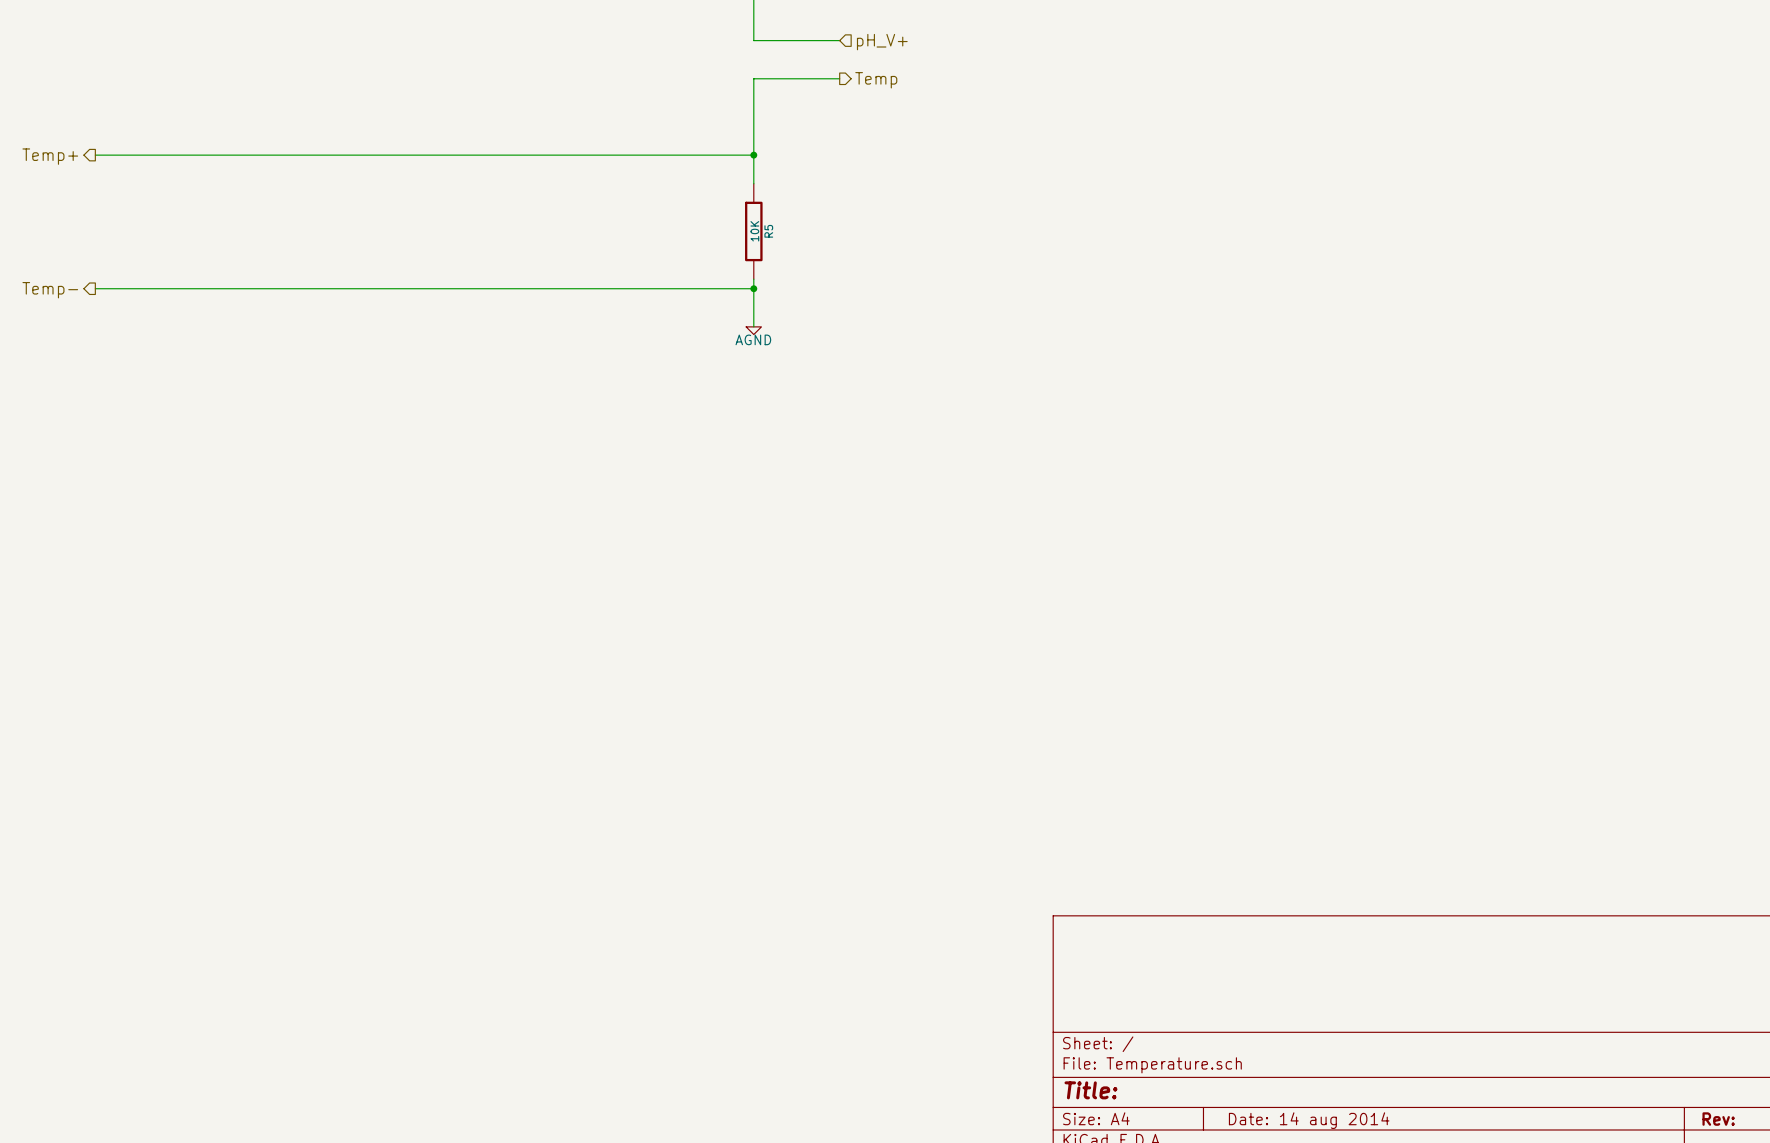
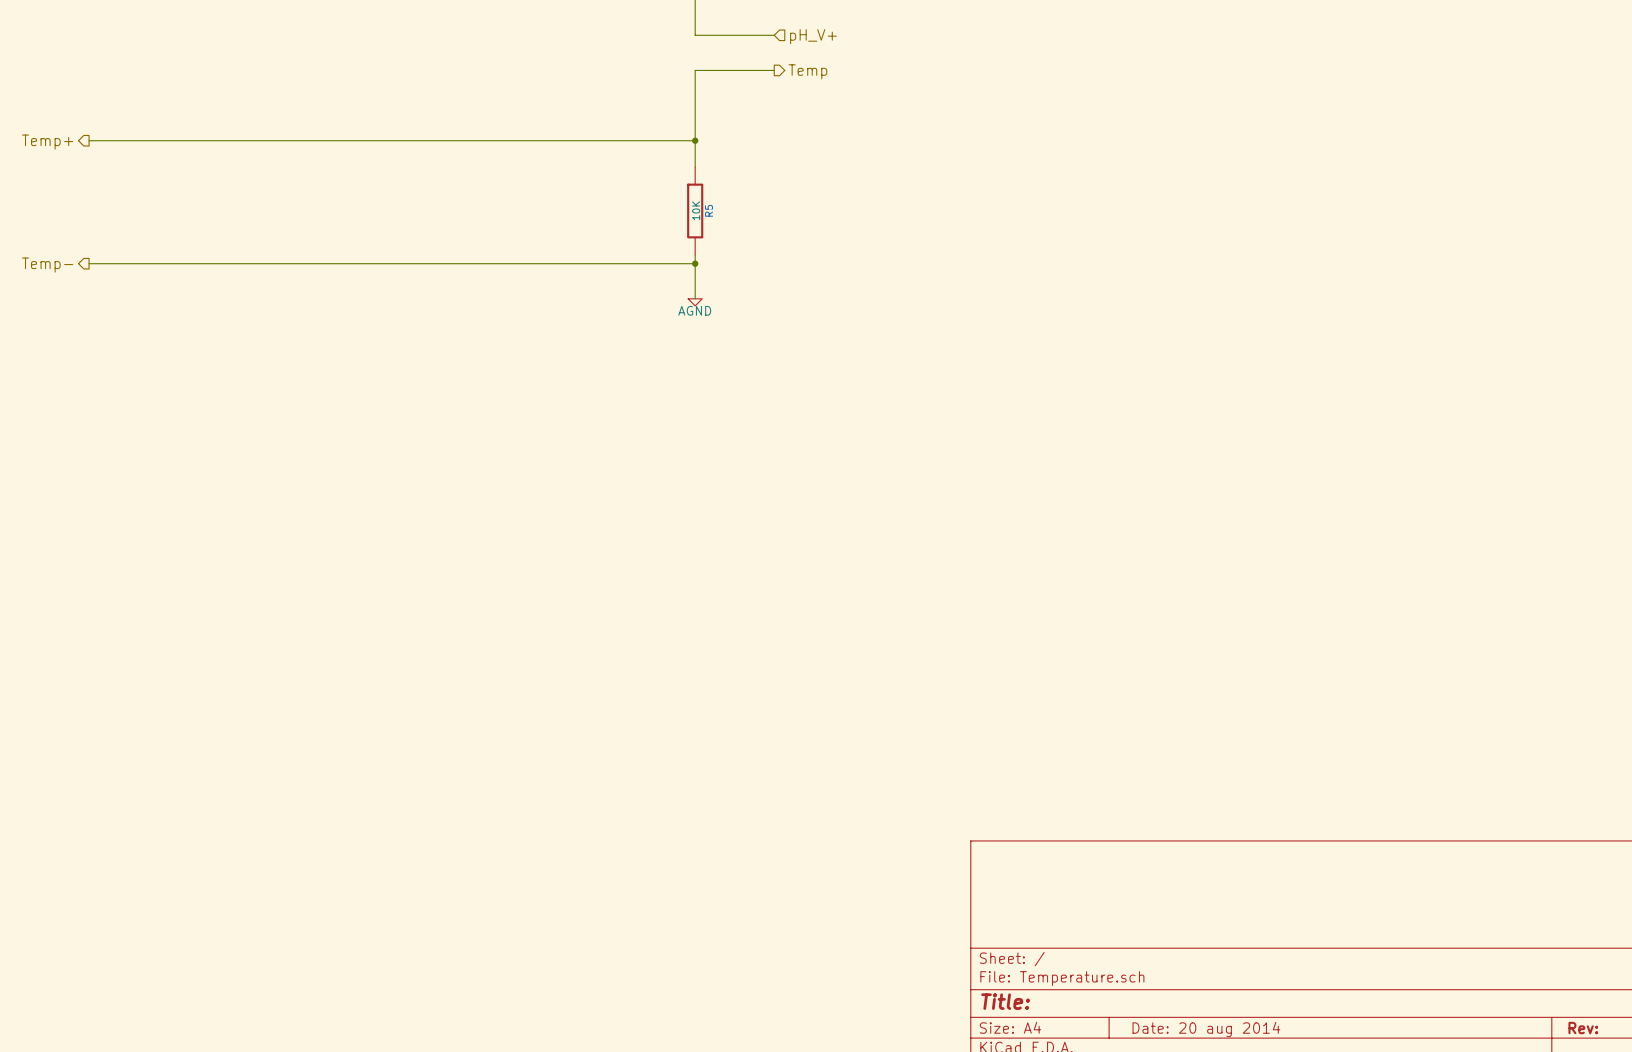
title block: Date: 14 aug 2014 (1309, 1120) -> Date: 20 aug 2014 (1206, 1029)

